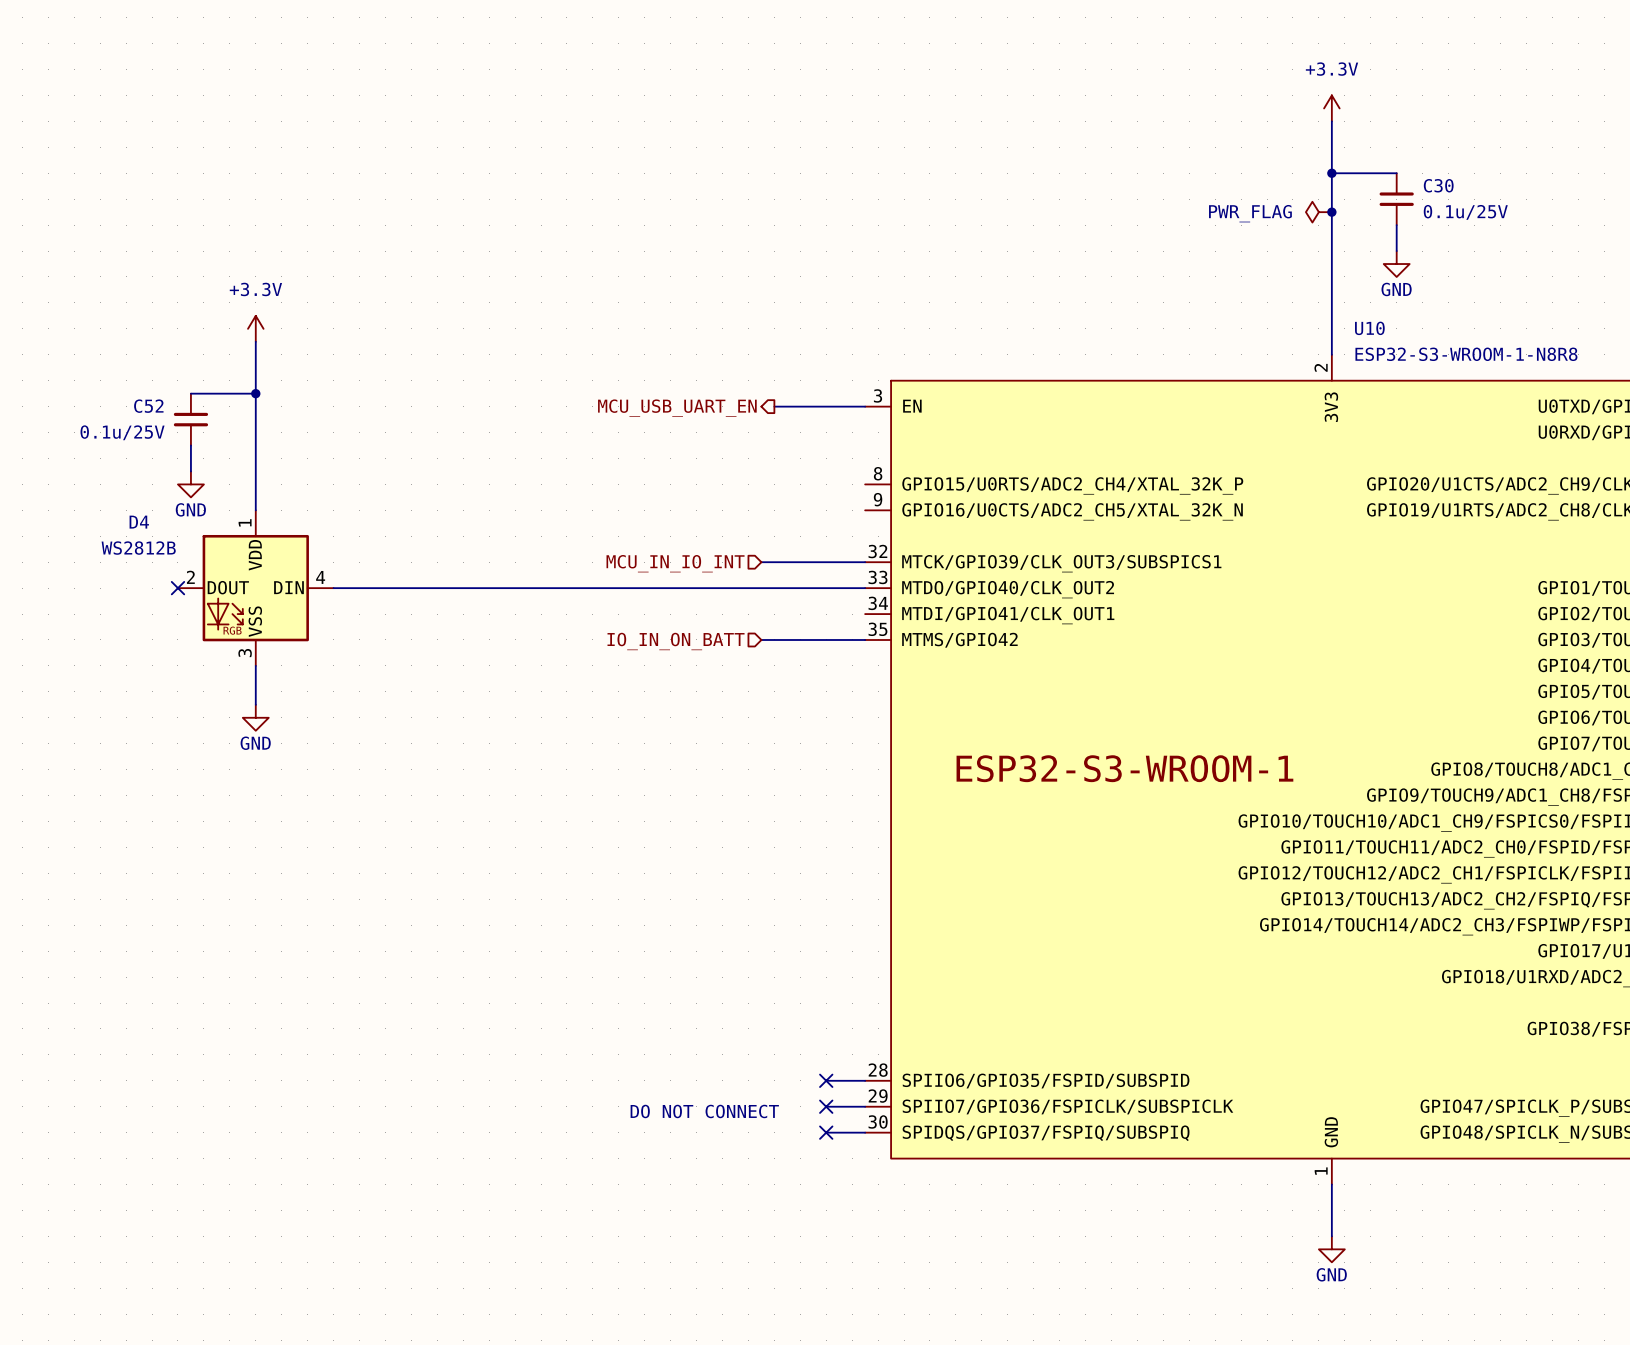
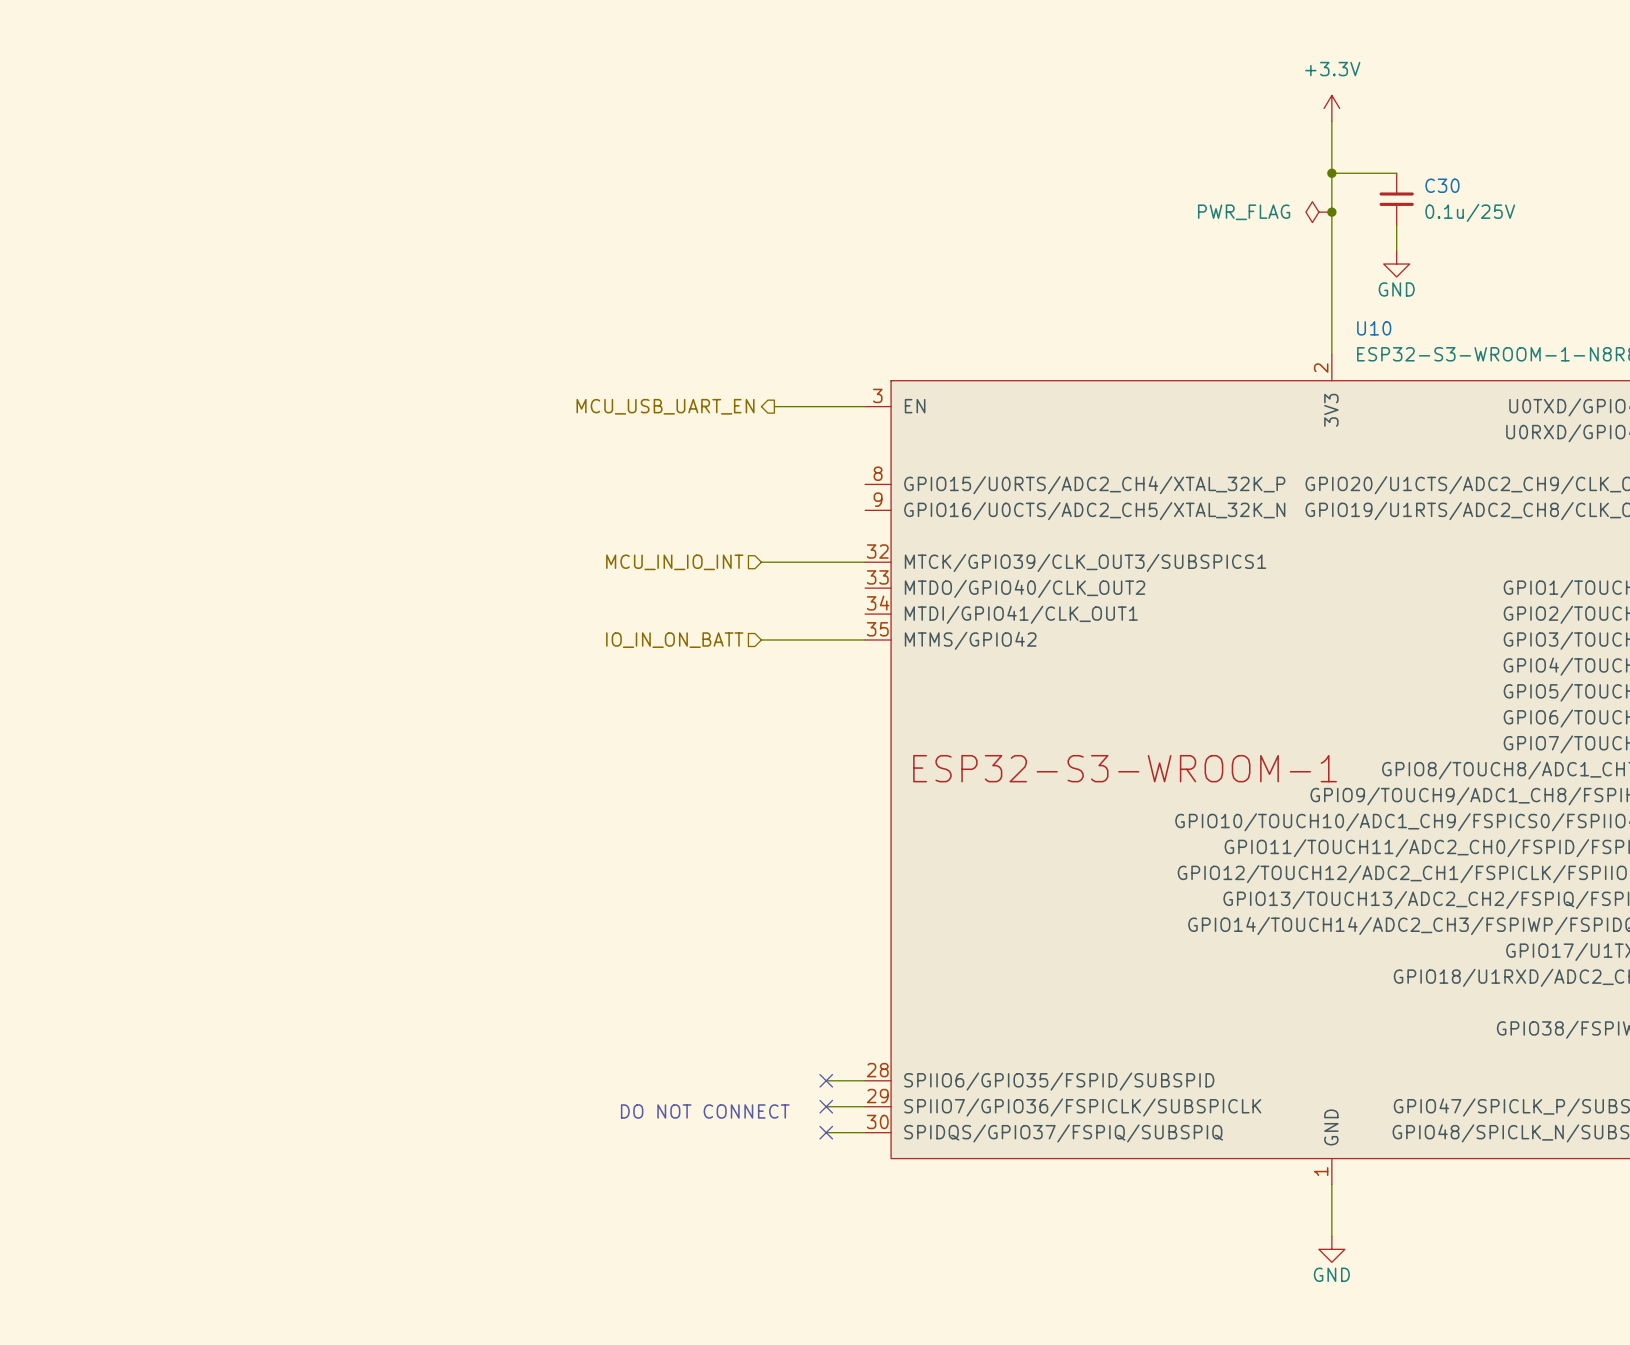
power symbol: +3.3V (255, 328) -> none
wire: (255, 341) (255, 510) -> none
wire: (190, 393) (255, 393) -> none
junction: (255, 393) -> none
C52: 0.1u/25V (190, 419) -> none
wire: (190, 445) (190, 471) -> none
power symbol: GND (190, 484) -> none
no-connect mark: (177, 588) -> none
D4: WS2812B (255, 588) -> none
wire: (333, 588) (865, 588) -> none
wire: (255, 665) (255, 704) -> none
power symbol: GND (255, 717) -> none

